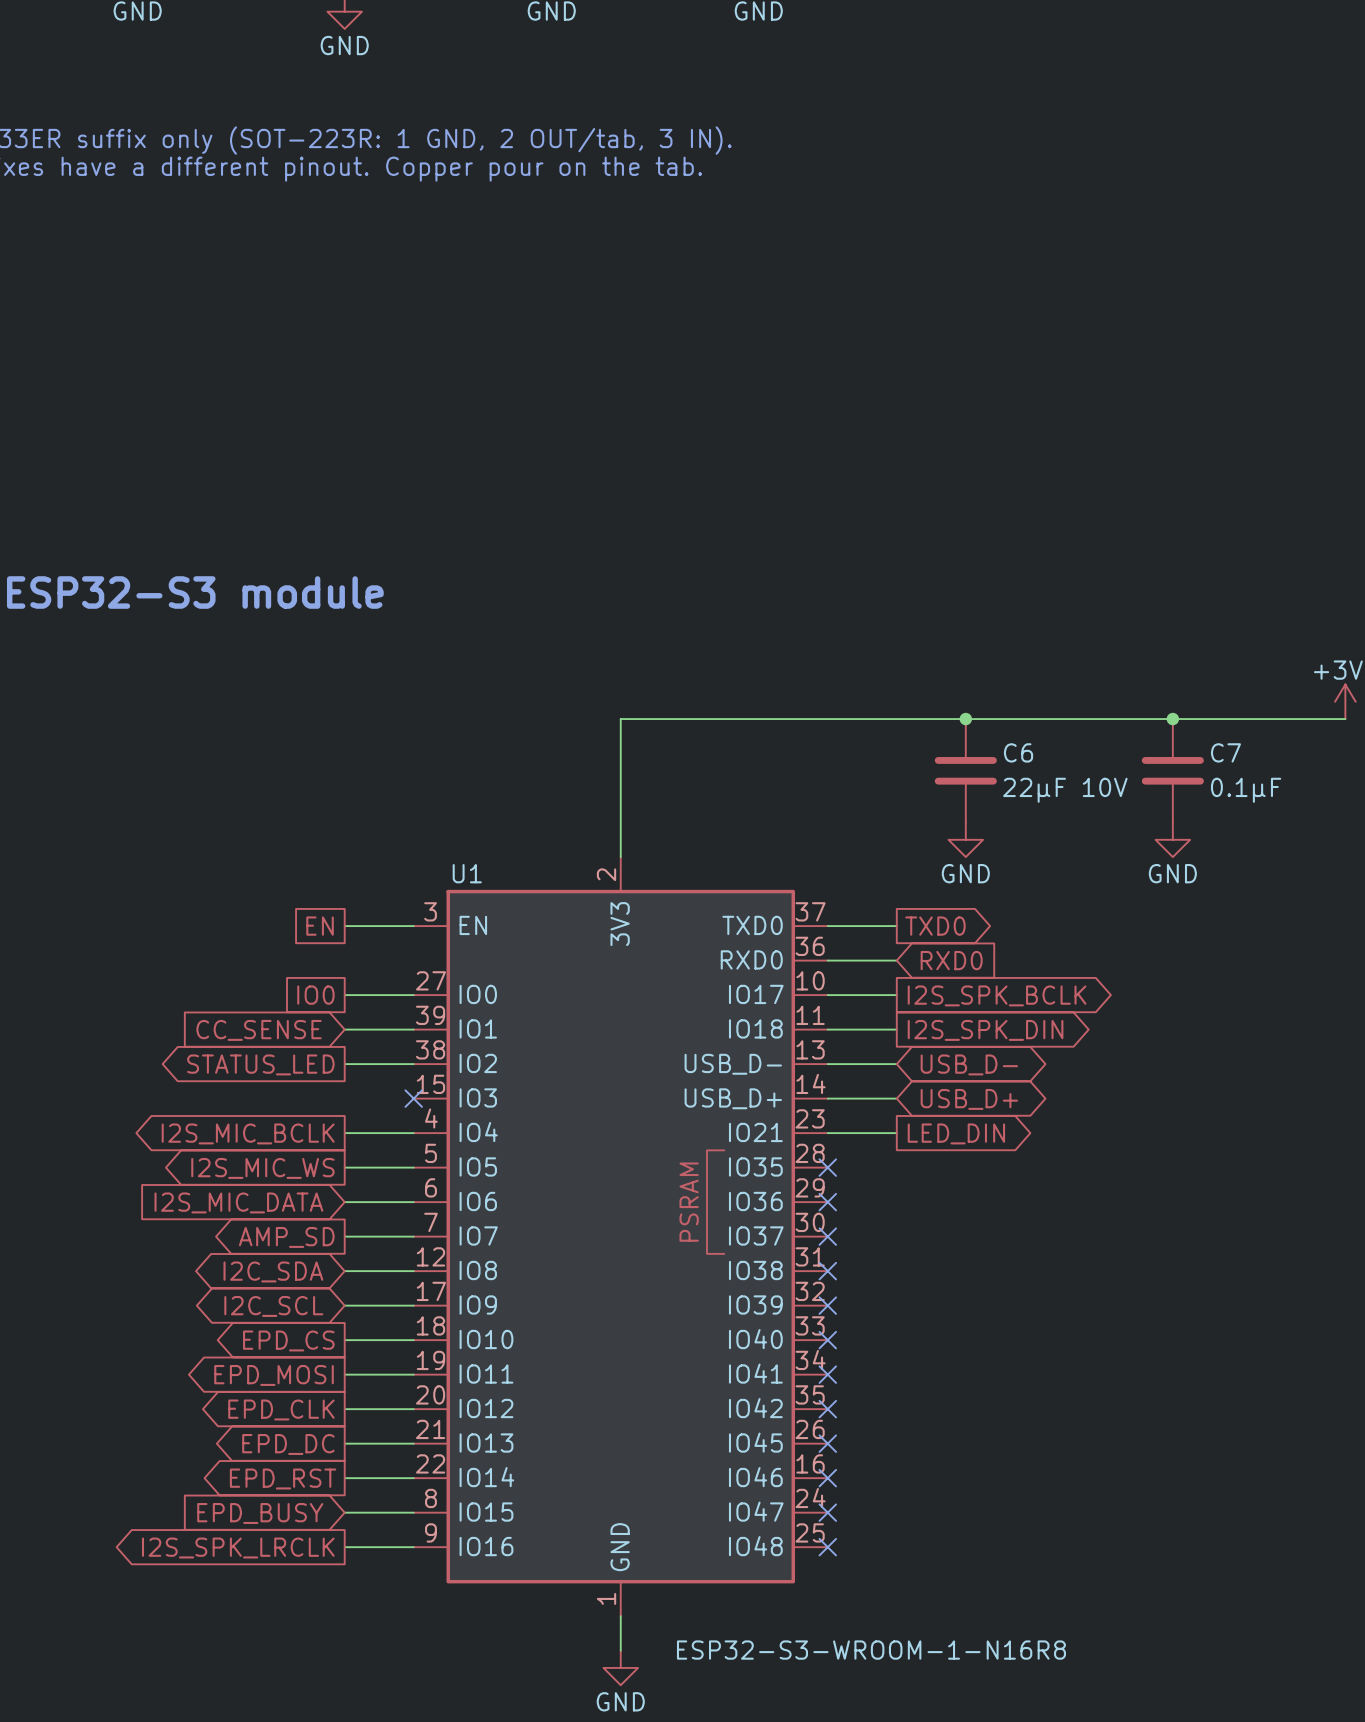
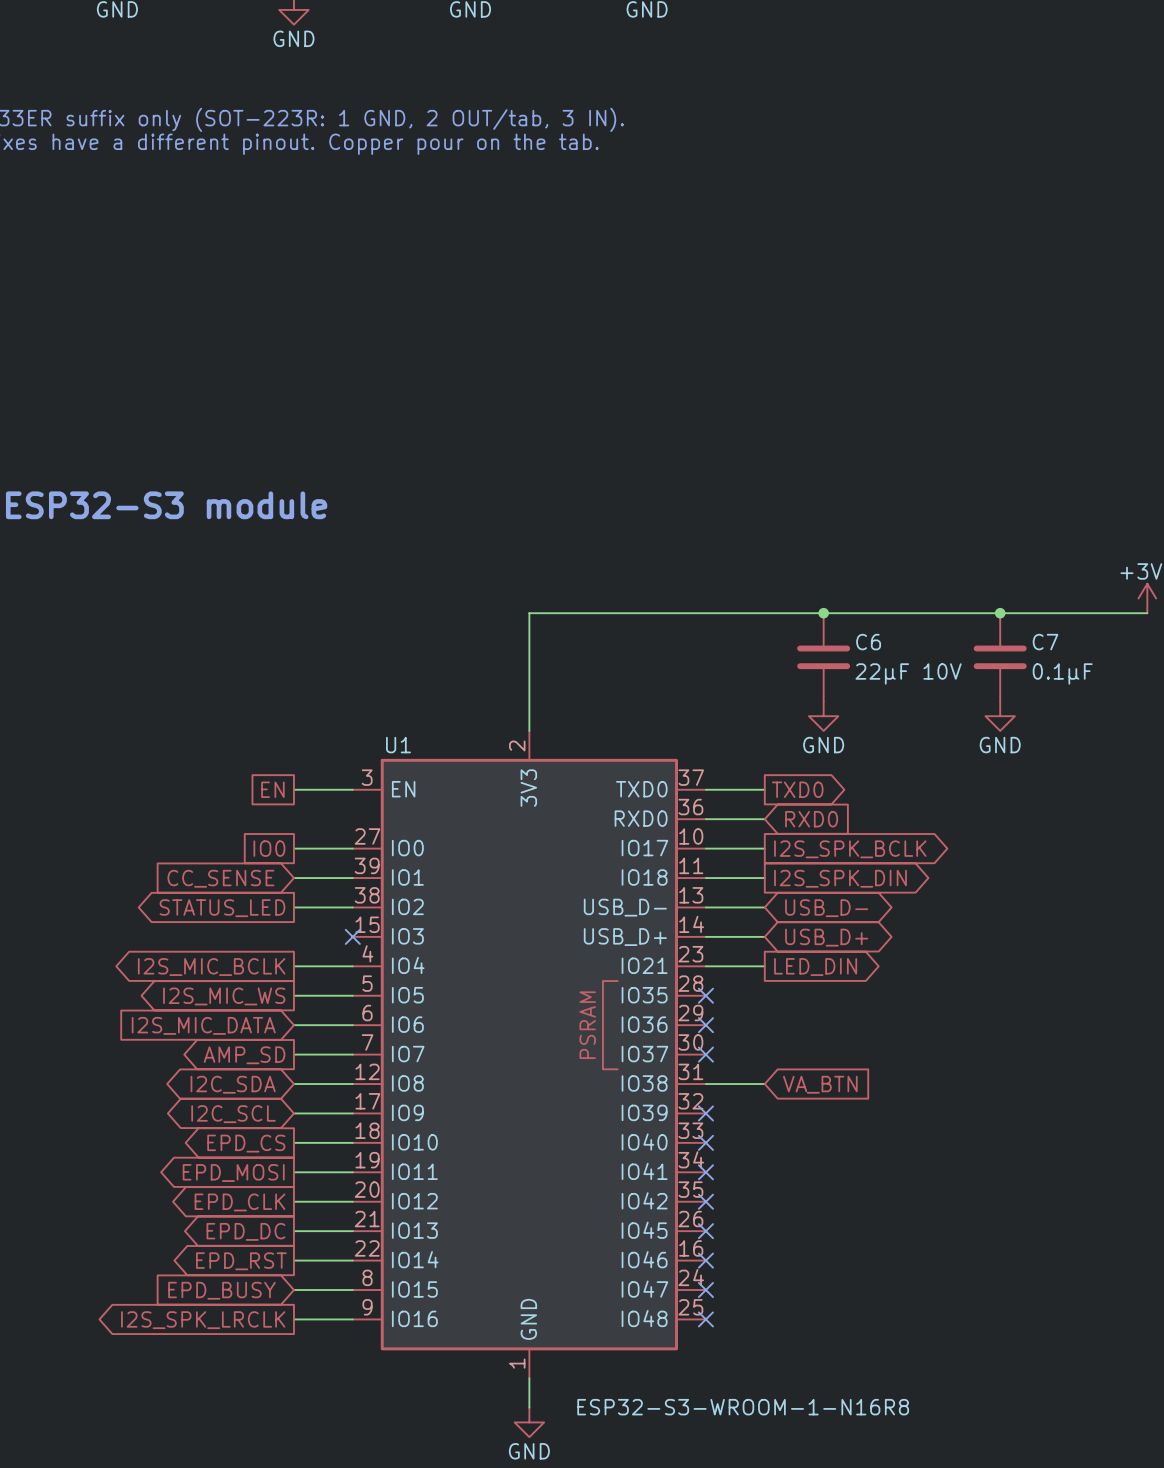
wire: none -> (705, 1084) (764, 1084)
no-connect mark: (827, 1271) -> none
global label: none -> VA_BTN (820, 1084)

